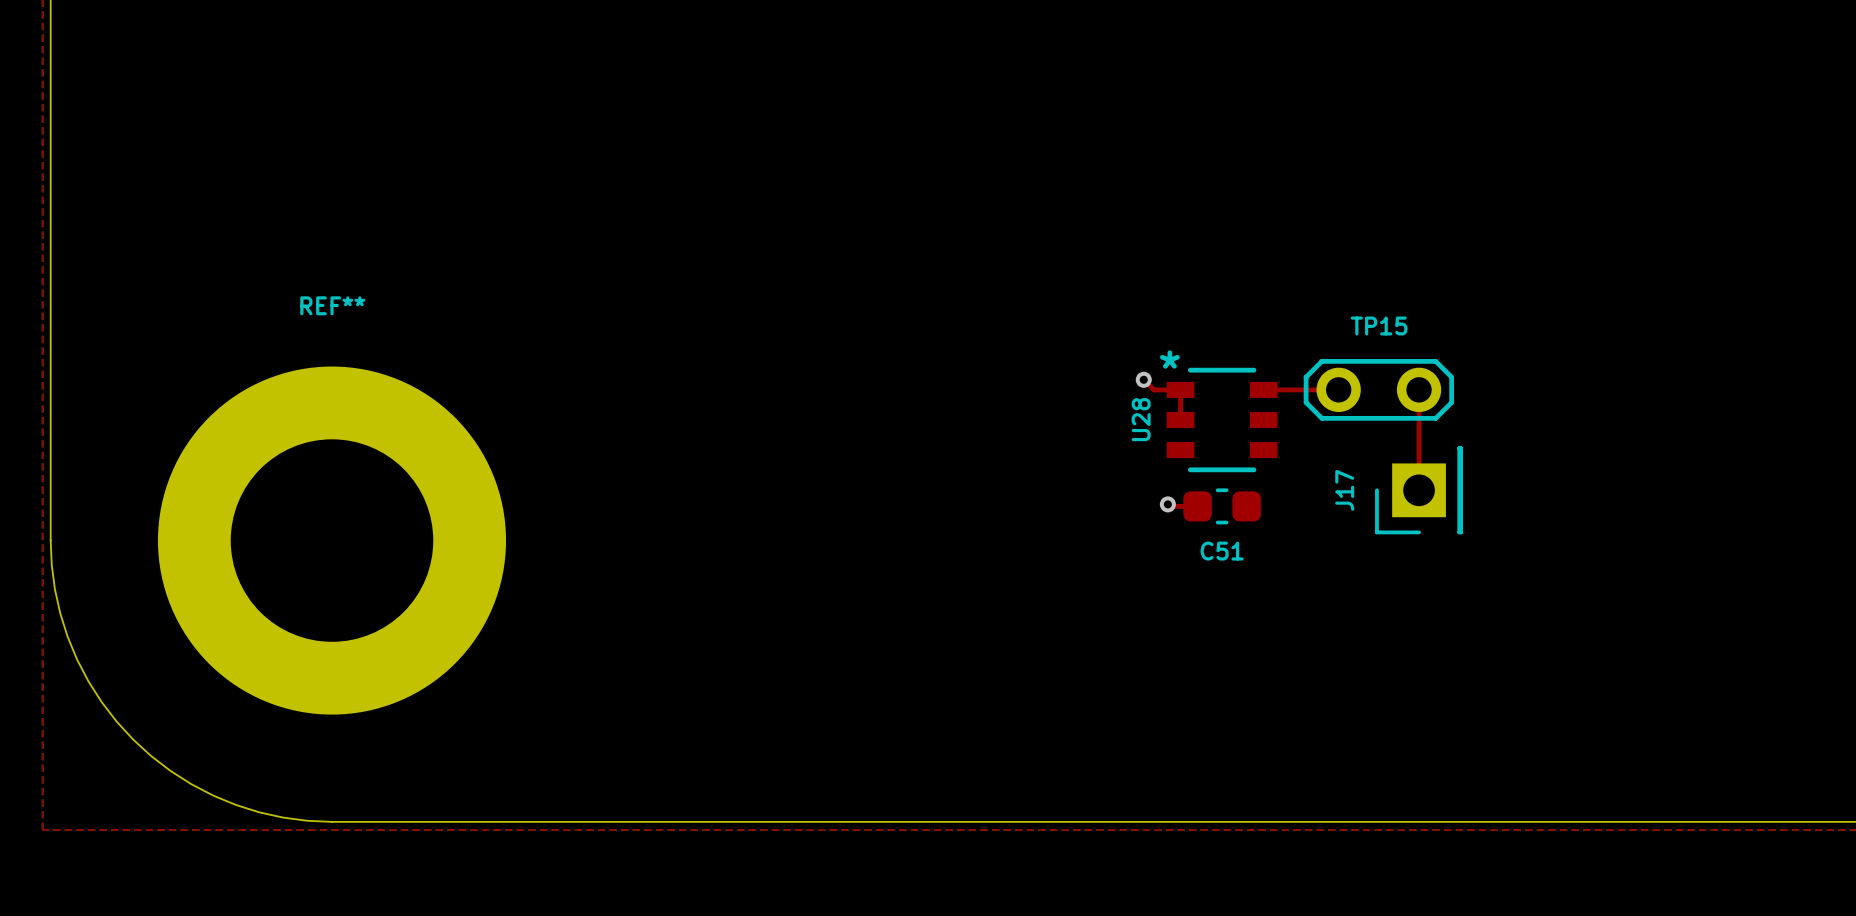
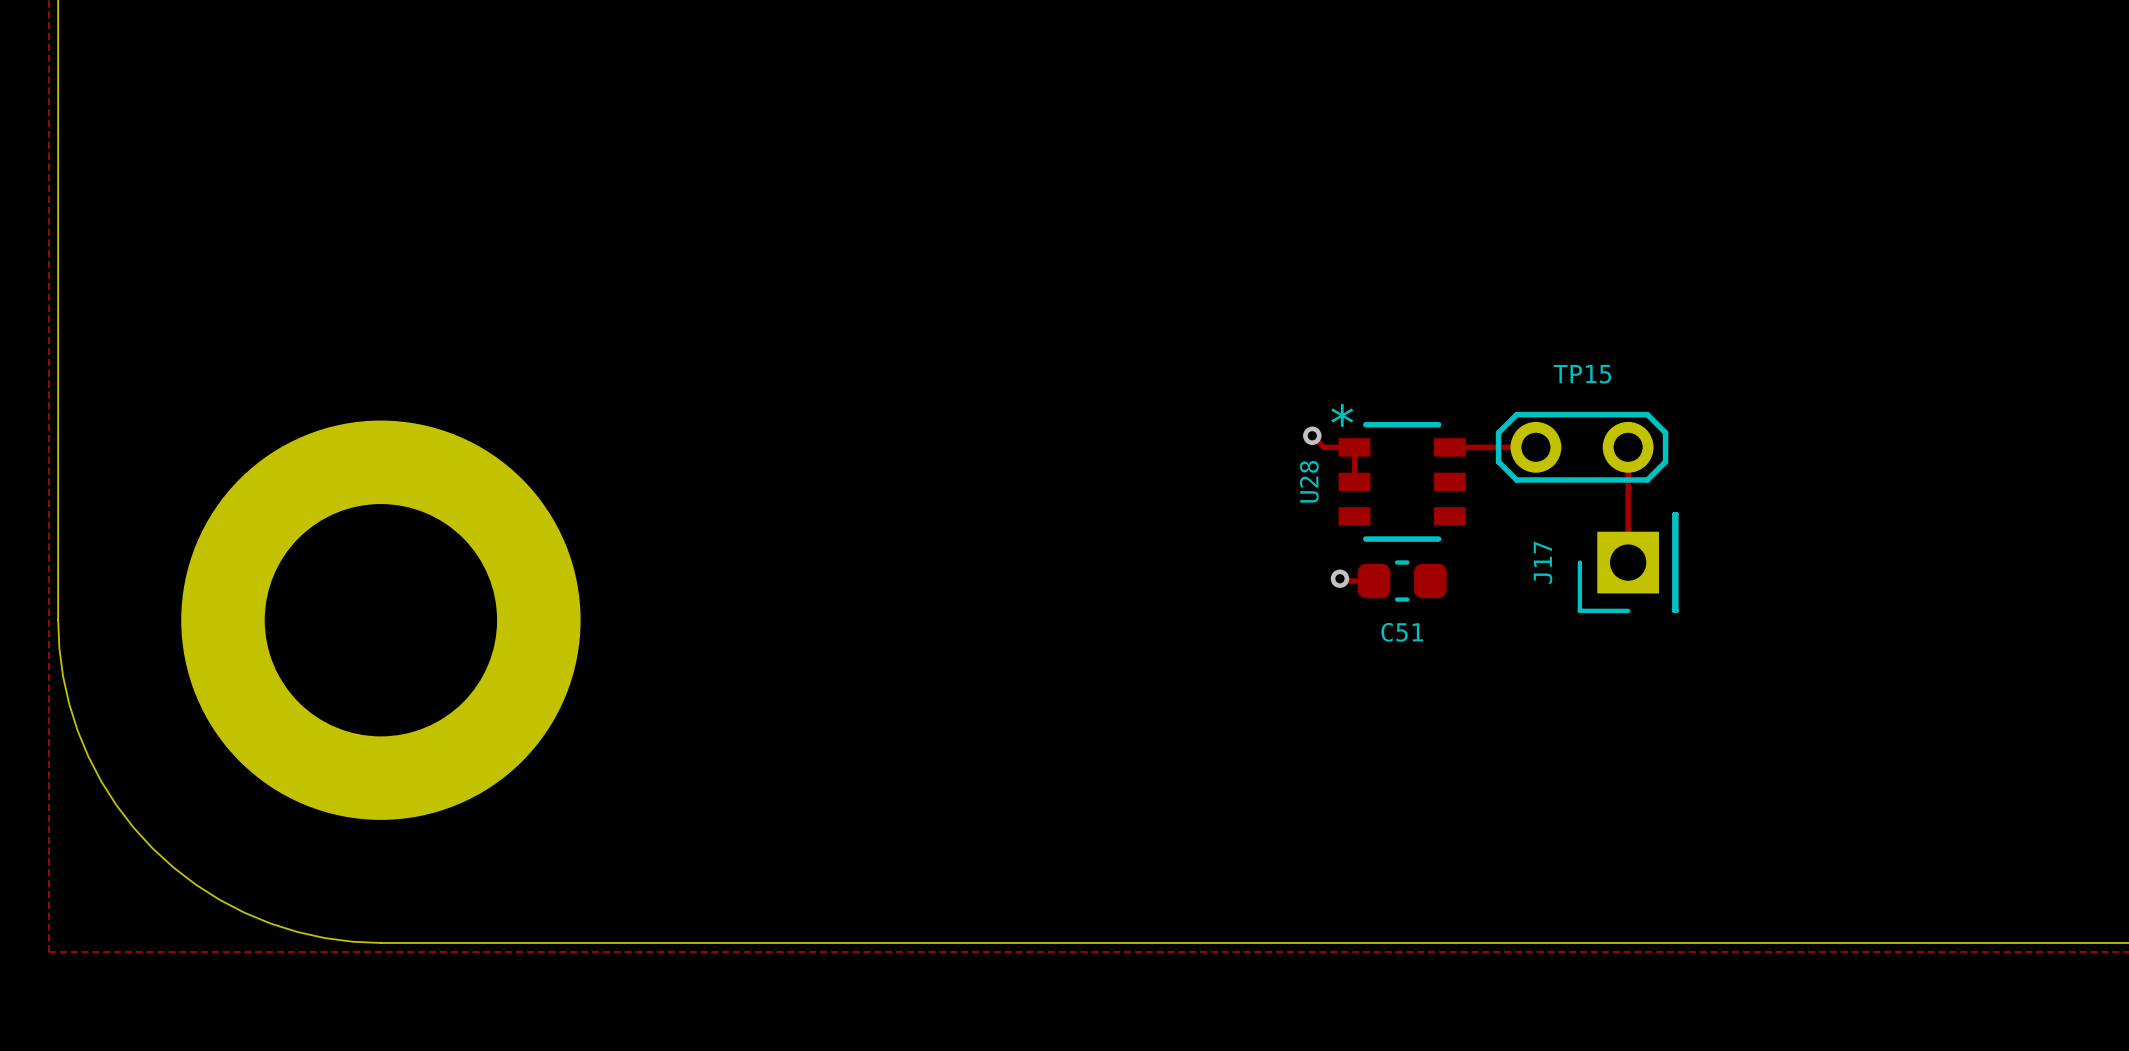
REF** name: REF** (332, 305) -> none

